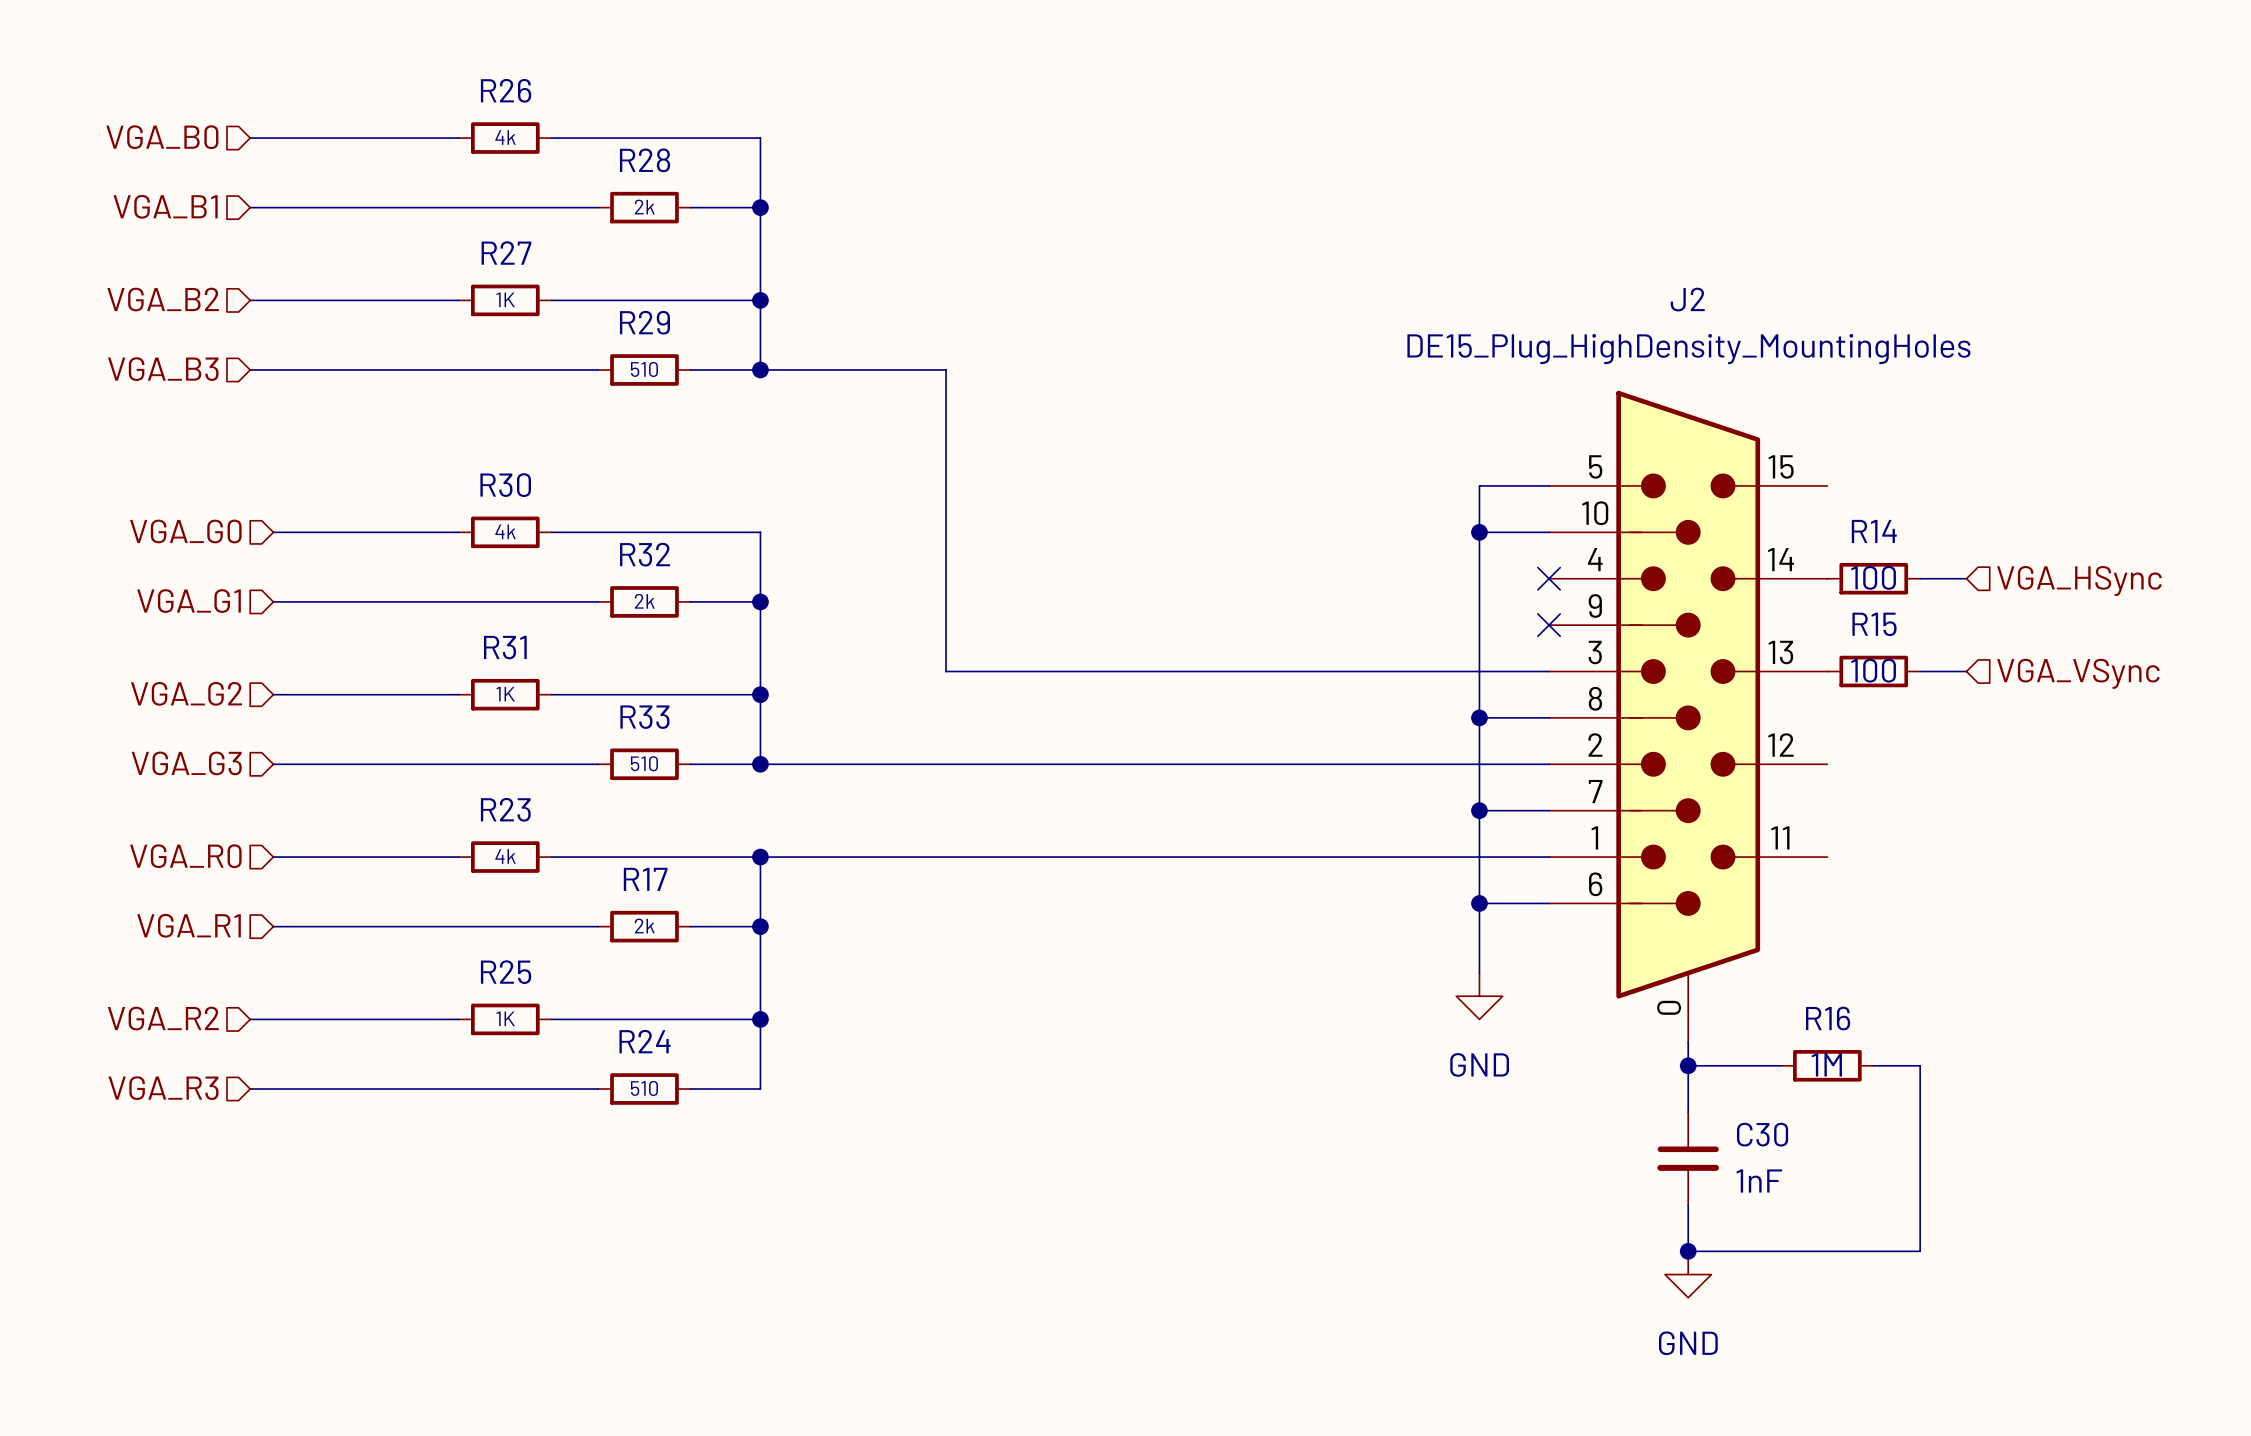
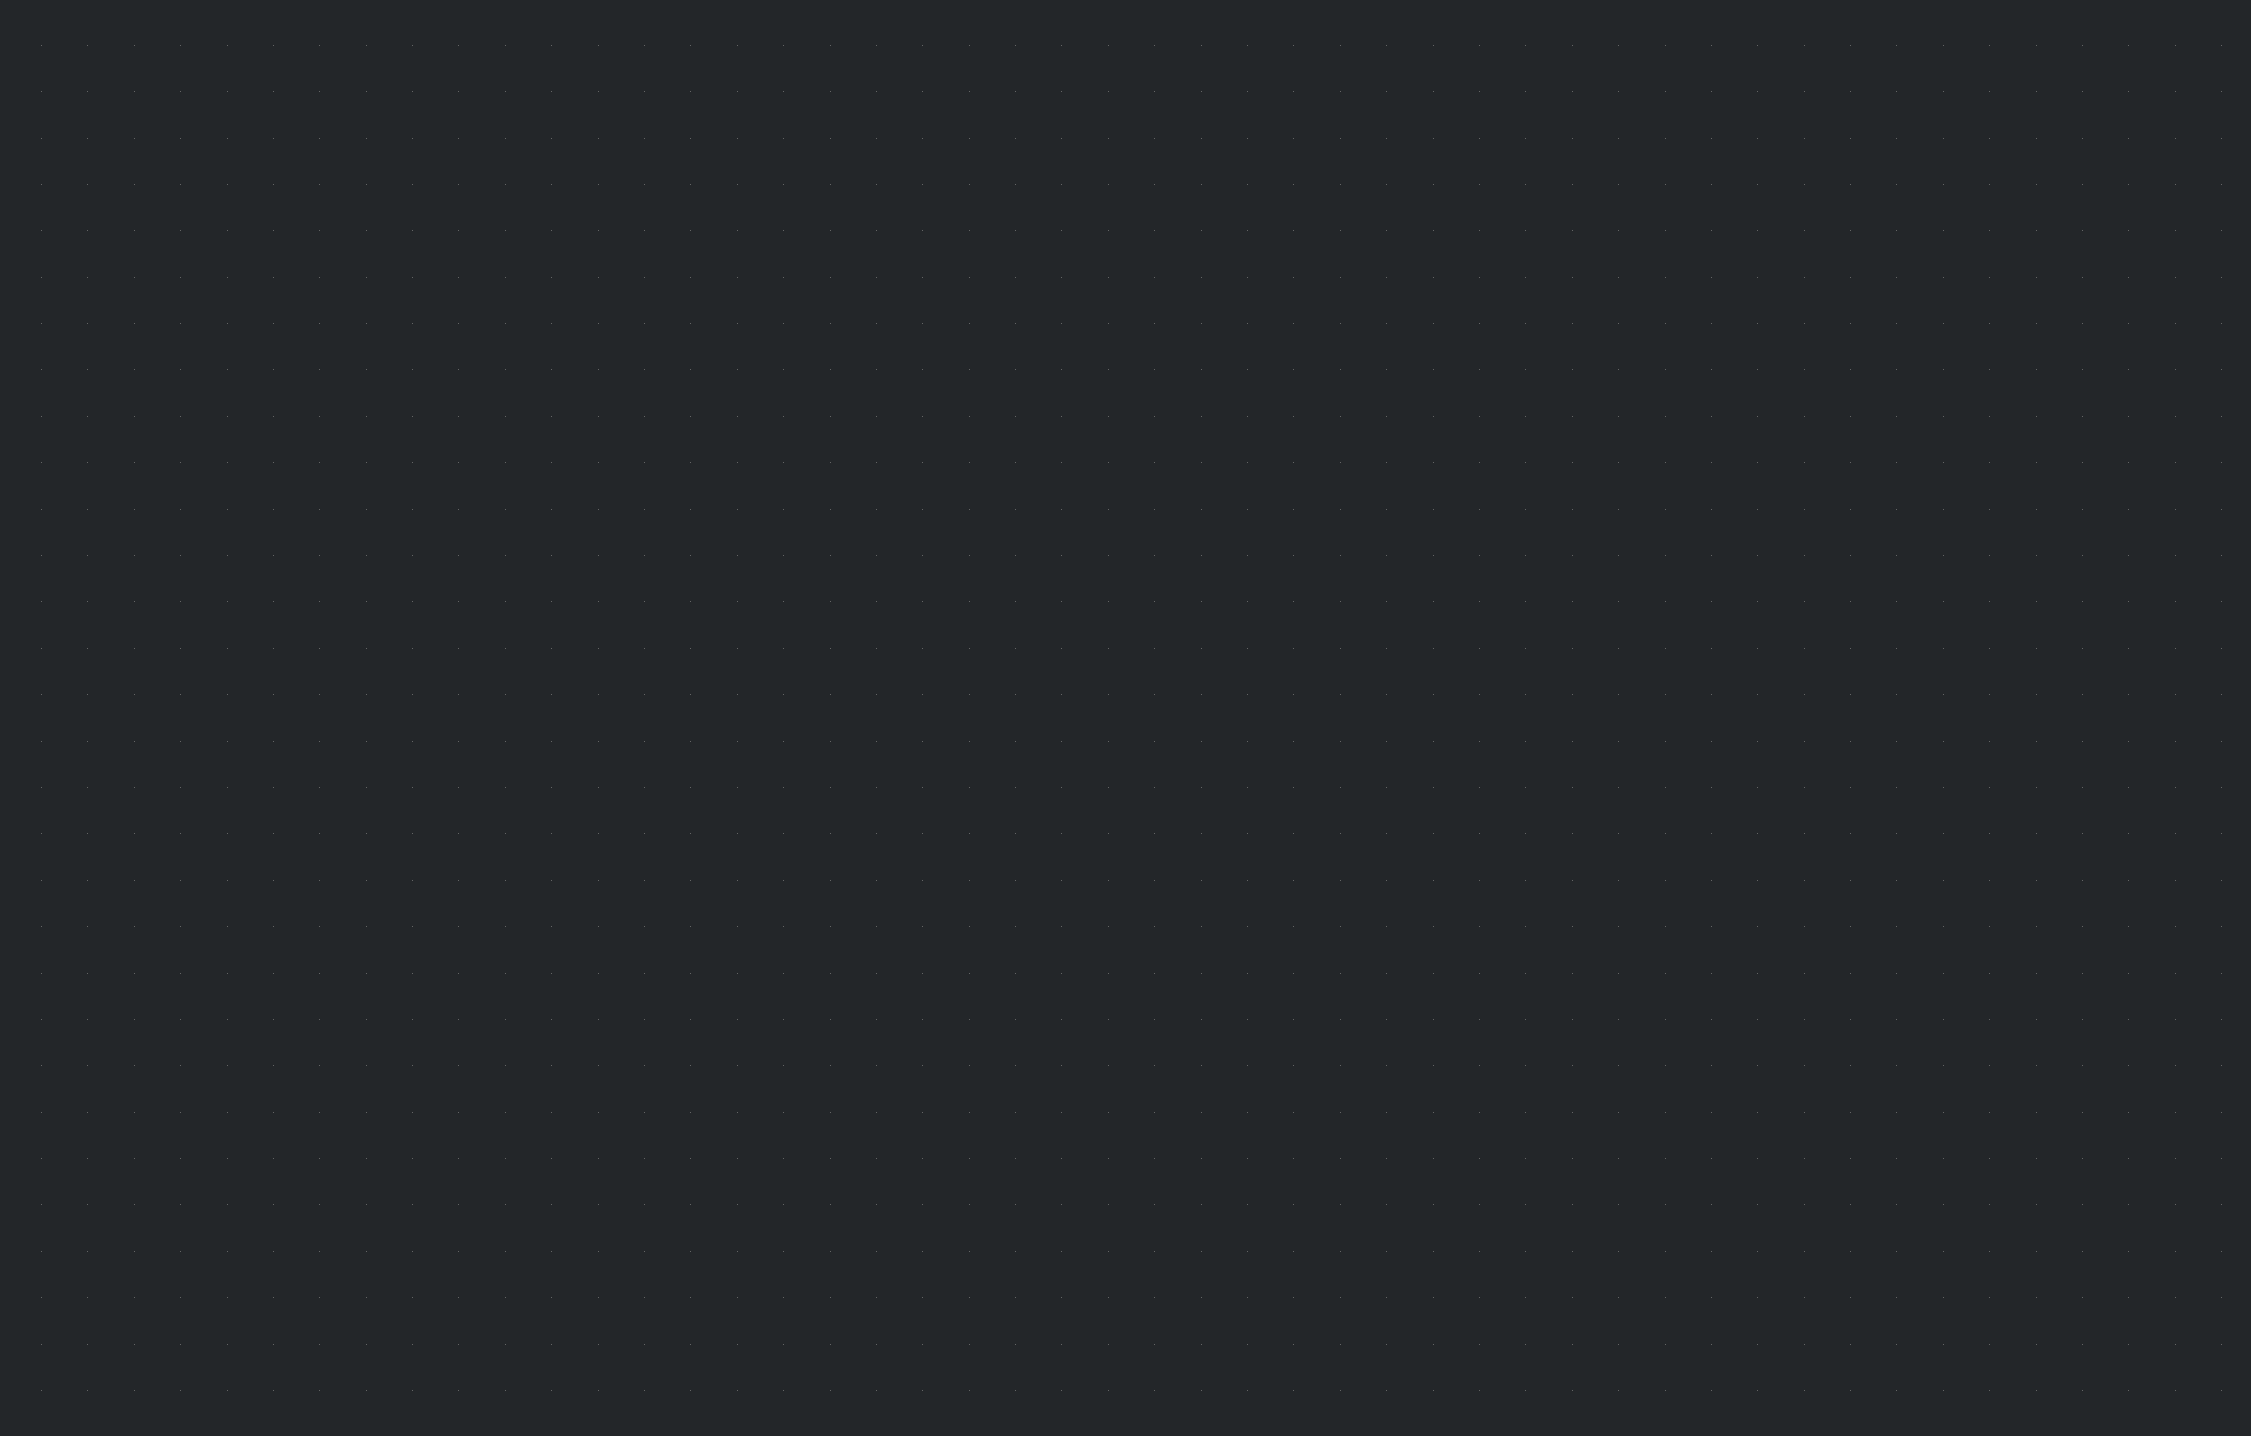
hierarchical label: VGA_B0 (162, 137) -> none
wire: (250, 138) (458, 138) -> none
R26: 4k (505, 138) -> none
wire: (551, 138) (760, 138) (760, 369) -> none
hierarchical label: VGA_B1 (165, 206) -> none
wire: (250, 207) (598, 207) -> none
R28: 2k (644, 207) -> none
wire: (690, 207) (760, 207) -> none
junction: (760, 207) -> none
hierarchical label: VGA_B2 (163, 299) -> none
wire: (250, 300) (458, 300) -> none
R27: 1K (505, 300) -> none
wire: (551, 300) (760, 300) -> none
junction: (760, 300) -> none
hierarchical label: VGA_B3 (163, 369) -> none
wire: (250, 369) (598, 369) -> none
R29: 510 (644, 369) -> none
wire: (690, 369) (946, 369) (946, 671) (1549, 671) -> none
junction: (760, 369) -> none
wire: (1549, 485) (1479, 485) (1479, 973) -> none
hierarchical label: VGA_G0 (185, 531) -> none
wire: (273, 532) (458, 532) -> none
R30: 4k (505, 532) -> none
wire: (551, 532) (760, 532) (760, 764) -> none
wire: (1479, 532) (1549, 532) -> none
junction: (1479, 532) -> none
no-connect mark: (1549, 578) -> none
R14: 100 (1873, 578) -> none
wire: (1920, 578) (1966, 578) -> none
hierarchical label: VGA_HSync (2079, 581) -> none
hierarchical label: VGA_G1 (189, 601) -> none
wire: (273, 601) (598, 601) -> none
R32: 2k (644, 601) -> none
wire: (690, 601) (760, 601) -> none
junction: (760, 601) -> none
no-connect mark: (1549, 625) -> none
R15: 100 (1873, 671) -> none
wire: (1920, 671) (1966, 671) -> none
hierarchical label: VGA_VSync (2078, 673) -> none
hierarchical label: VGA_G2 (186, 693) -> none
wire: (273, 694) (458, 694) -> none
R31: 1K (505, 694) -> none
wire: (551, 694) (760, 694) -> none
junction: (760, 694) -> none
J2: DE15_Plug_HighDensity_MountingHoles (1688, 716) -> none
wire: (1479, 717) (1549, 717) -> none
junction: (1479, 717) -> none
hierarchical label: VGA_G3 (186, 763) -> none
wire: (273, 764) (598, 764) -> none
R33: 510 (644, 764) -> none
wire: (690, 764) (1549, 764) -> none
junction: (760, 764) -> none
wire: (1479, 810) (1549, 810) -> none
junction: (1479, 810) -> none
hierarchical label: VGA_R0 (185, 856) -> none
wire: (273, 857) (458, 857) -> none
R23: 4k (505, 857) -> none
wire: (551, 857) (1549, 857) -> none
wire: (760, 857) (760, 1088) (690, 1088) -> none
junction: (760, 857) -> none
wire: (1479, 903) (1549, 903) -> none
junction: (1479, 903) -> none
hierarchical label: VGA_R1 (189, 925) -> none
wire: (273, 926) (598, 926) -> none
R17: 2k (644, 926) -> none
wire: (690, 926) (760, 926) -> none
junction: (760, 926) -> none
power symbol: GND (1479, 996) -> none
hierarchical label: VGA_R2 (163, 1018) -> none
wire: (250, 1019) (458, 1019) -> none
R25: 1K (505, 1019) -> none
wire: (551, 1019) (760, 1019) -> none
junction: (760, 1019) -> none
wire: (1688, 1042) (1688, 1112) -> none
wire: (1688, 1065) (1780, 1065) -> none
junction: (1688, 1065) -> none
R16: 1M (1827, 1065) -> none
wire: (1873, 1065) (1920, 1065) (1920, 1251) (1688, 1251) (1688, 1204) -> none
hierarchical label: VGA_R3 (163, 1088) -> none
wire: (250, 1088) (598, 1088) -> none
R24: 510 (644, 1088) -> none
C30: 1nF (1688, 1158) -> none
junction: (1688, 1251) -> none
power symbol: GND (1688, 1274) -> none

